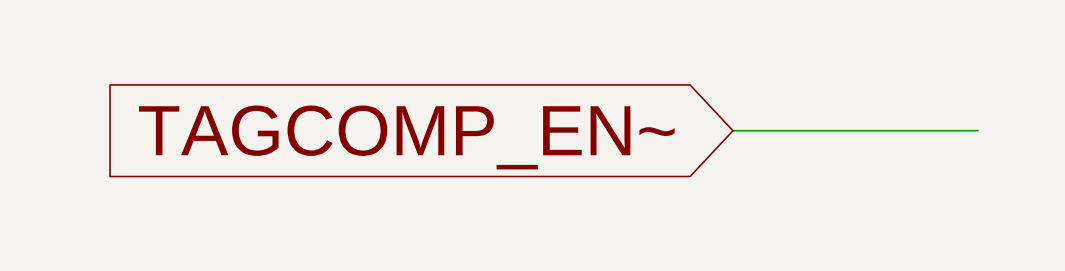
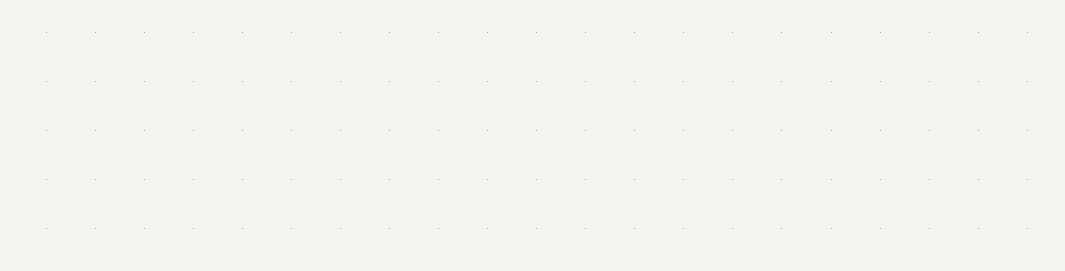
wire: (732, 130) (978, 130) -> none
global label: TAGCOMP_EN~ (406, 137) -> none

